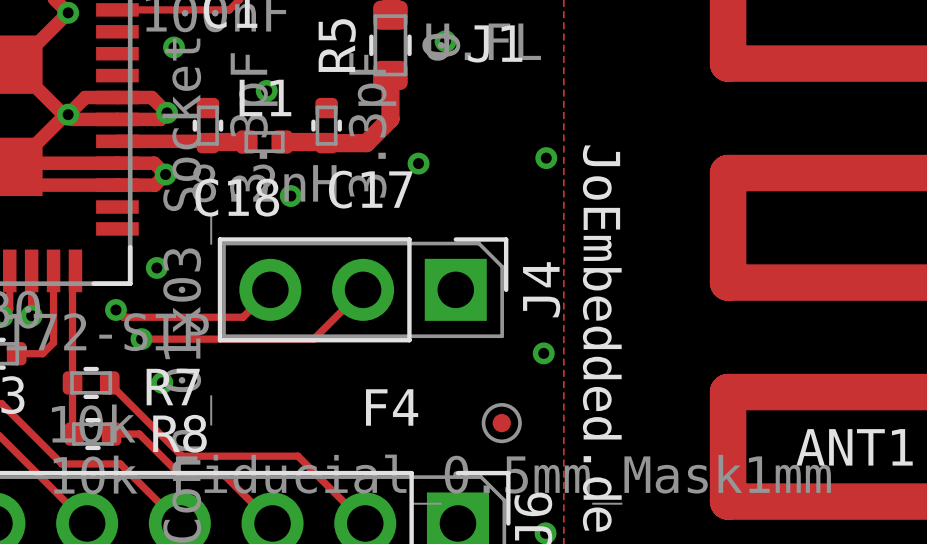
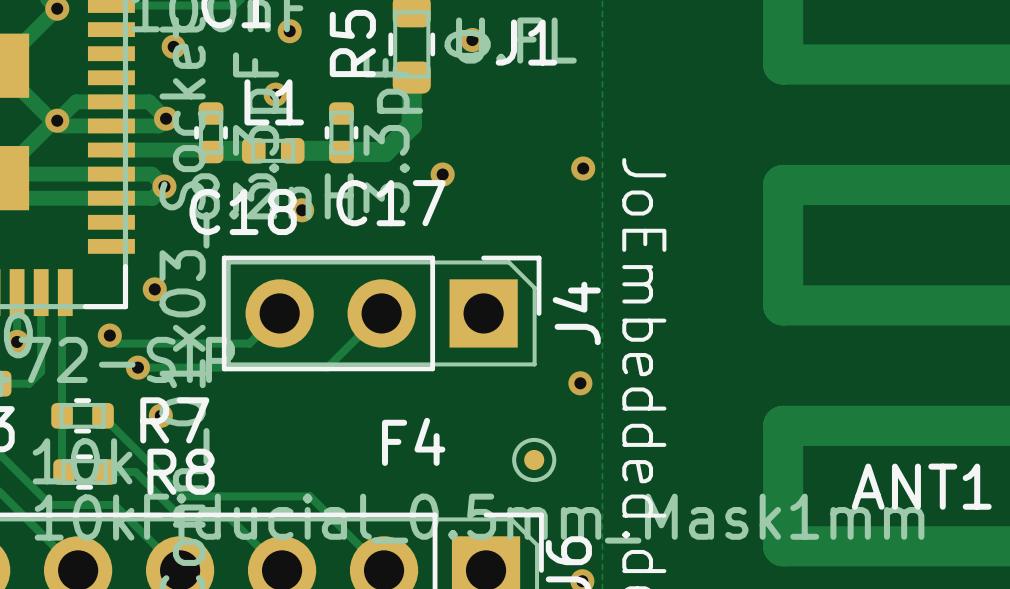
via: none -> (289, 31)

